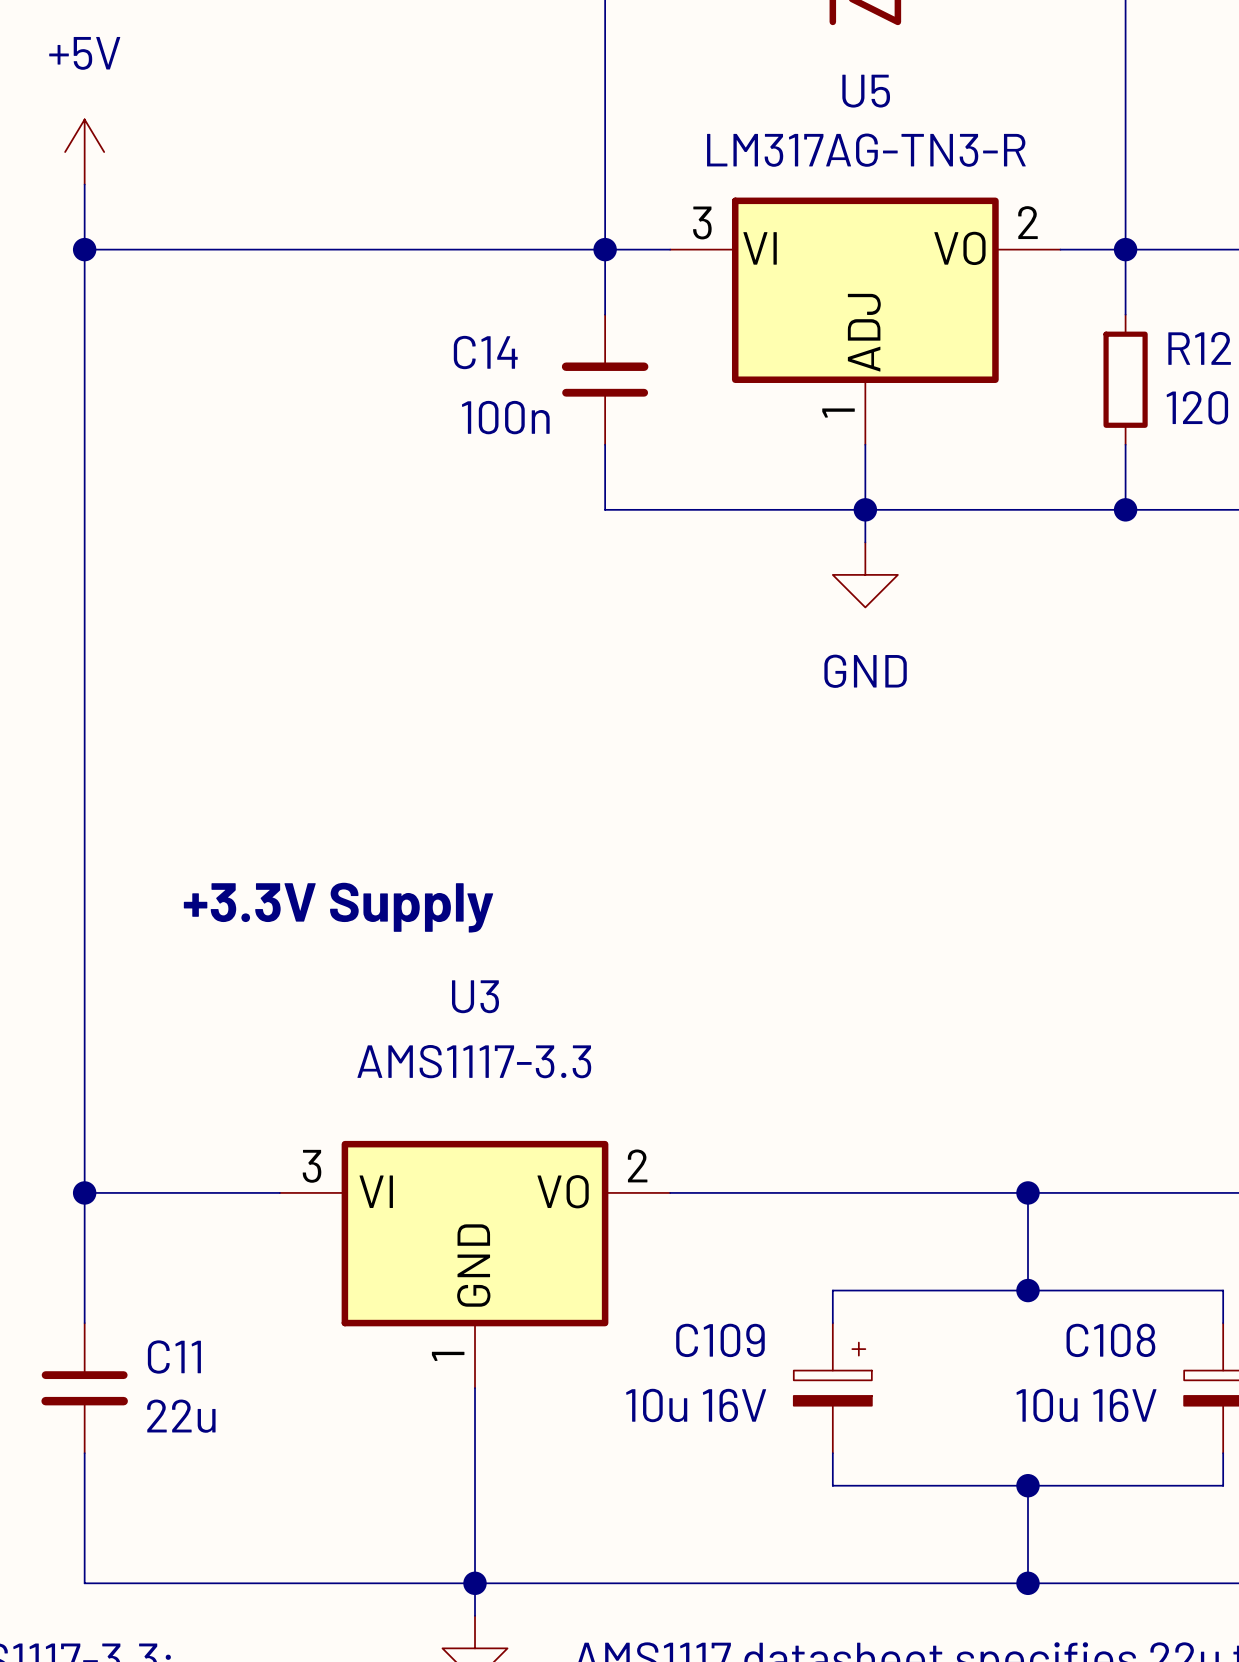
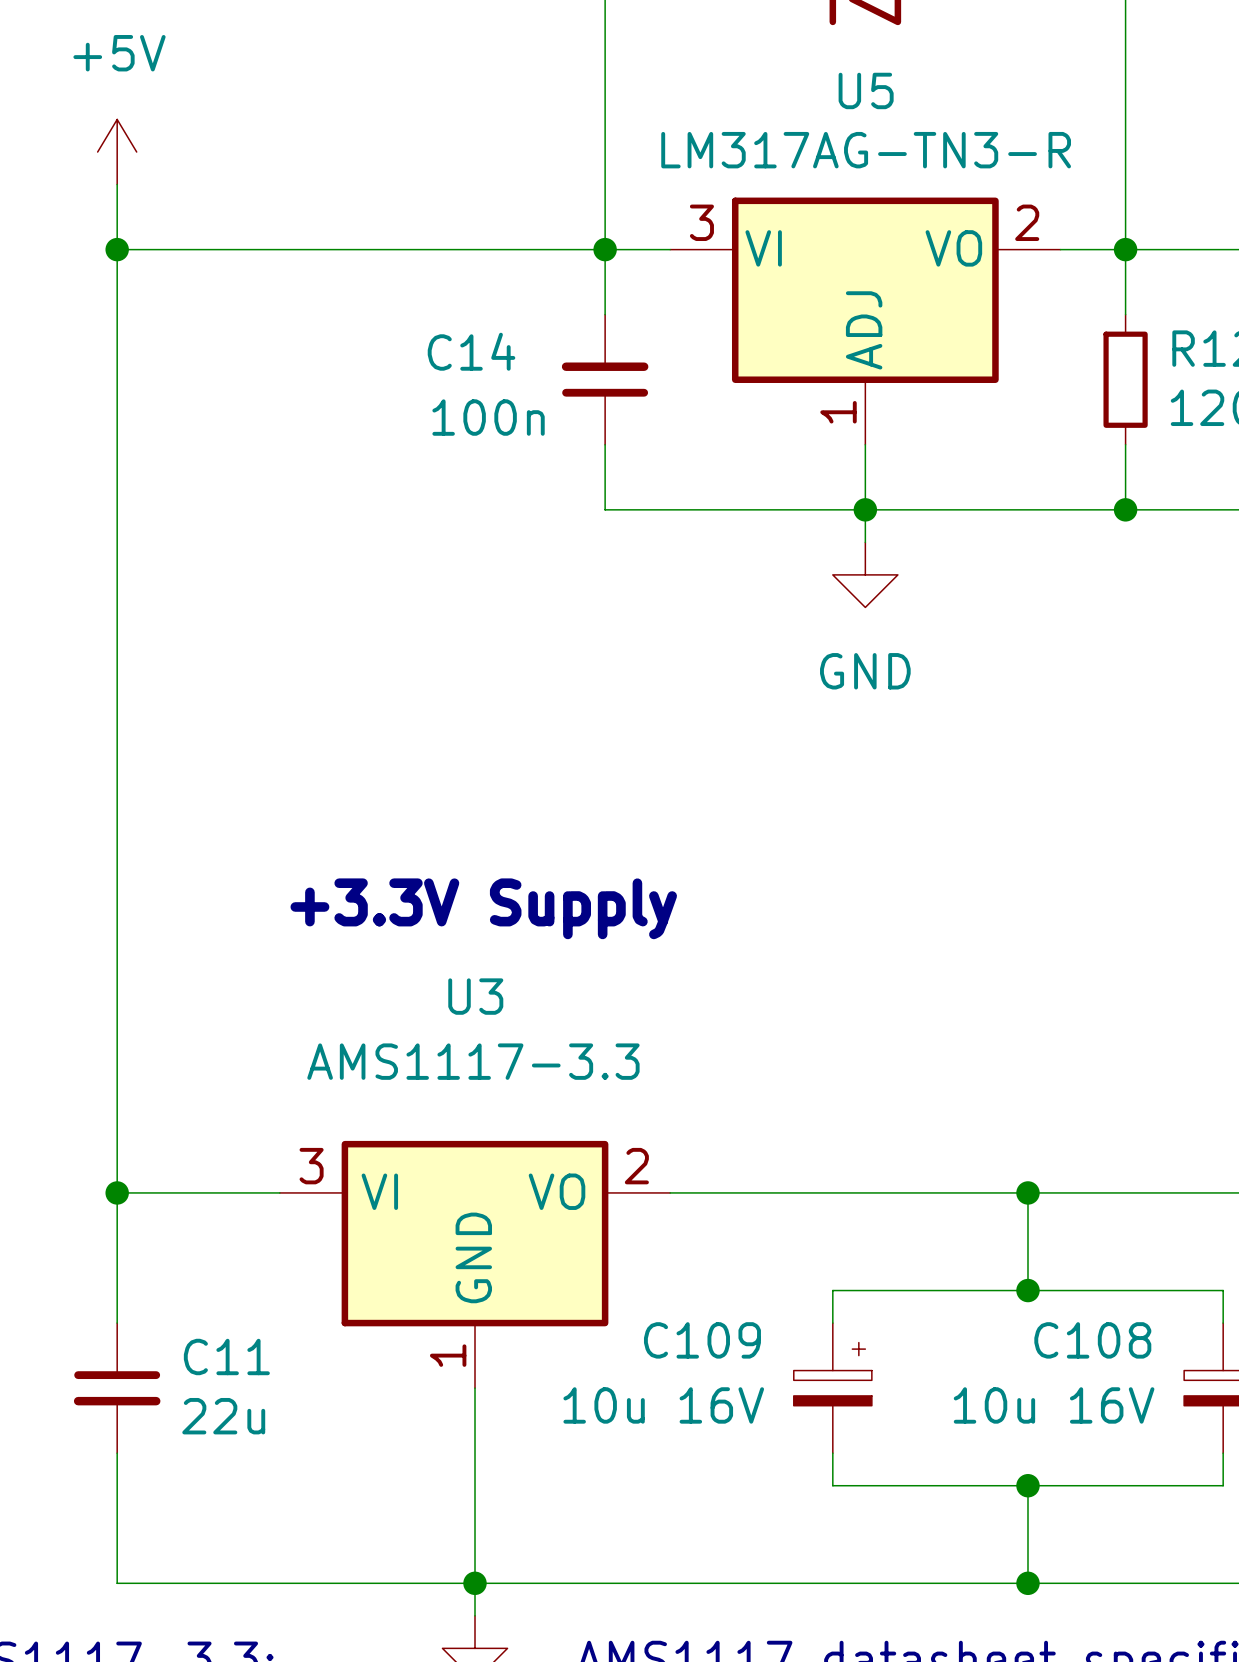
power symbol position: +5V (84, 152) -> +5V (117, 152)
wire: (84, 184) (84, 1323) -> (117, 184) (117, 1323)
wire: (84, 249) (117, 249) -> none
junction position: (84, 249) -> (117, 249)
text position: +3.3V Supply (338, 907) -> +3.3V Supply (483, 908)
wire: (84, 1192) (117, 1192) -> none
junction position: (84, 1192) -> (117, 1192)
C11 position: (84, 1388) -> (117, 1388)
wire: (84, 1453) (84, 1583) (117, 1583) -> (117, 1453) (117, 1583)

